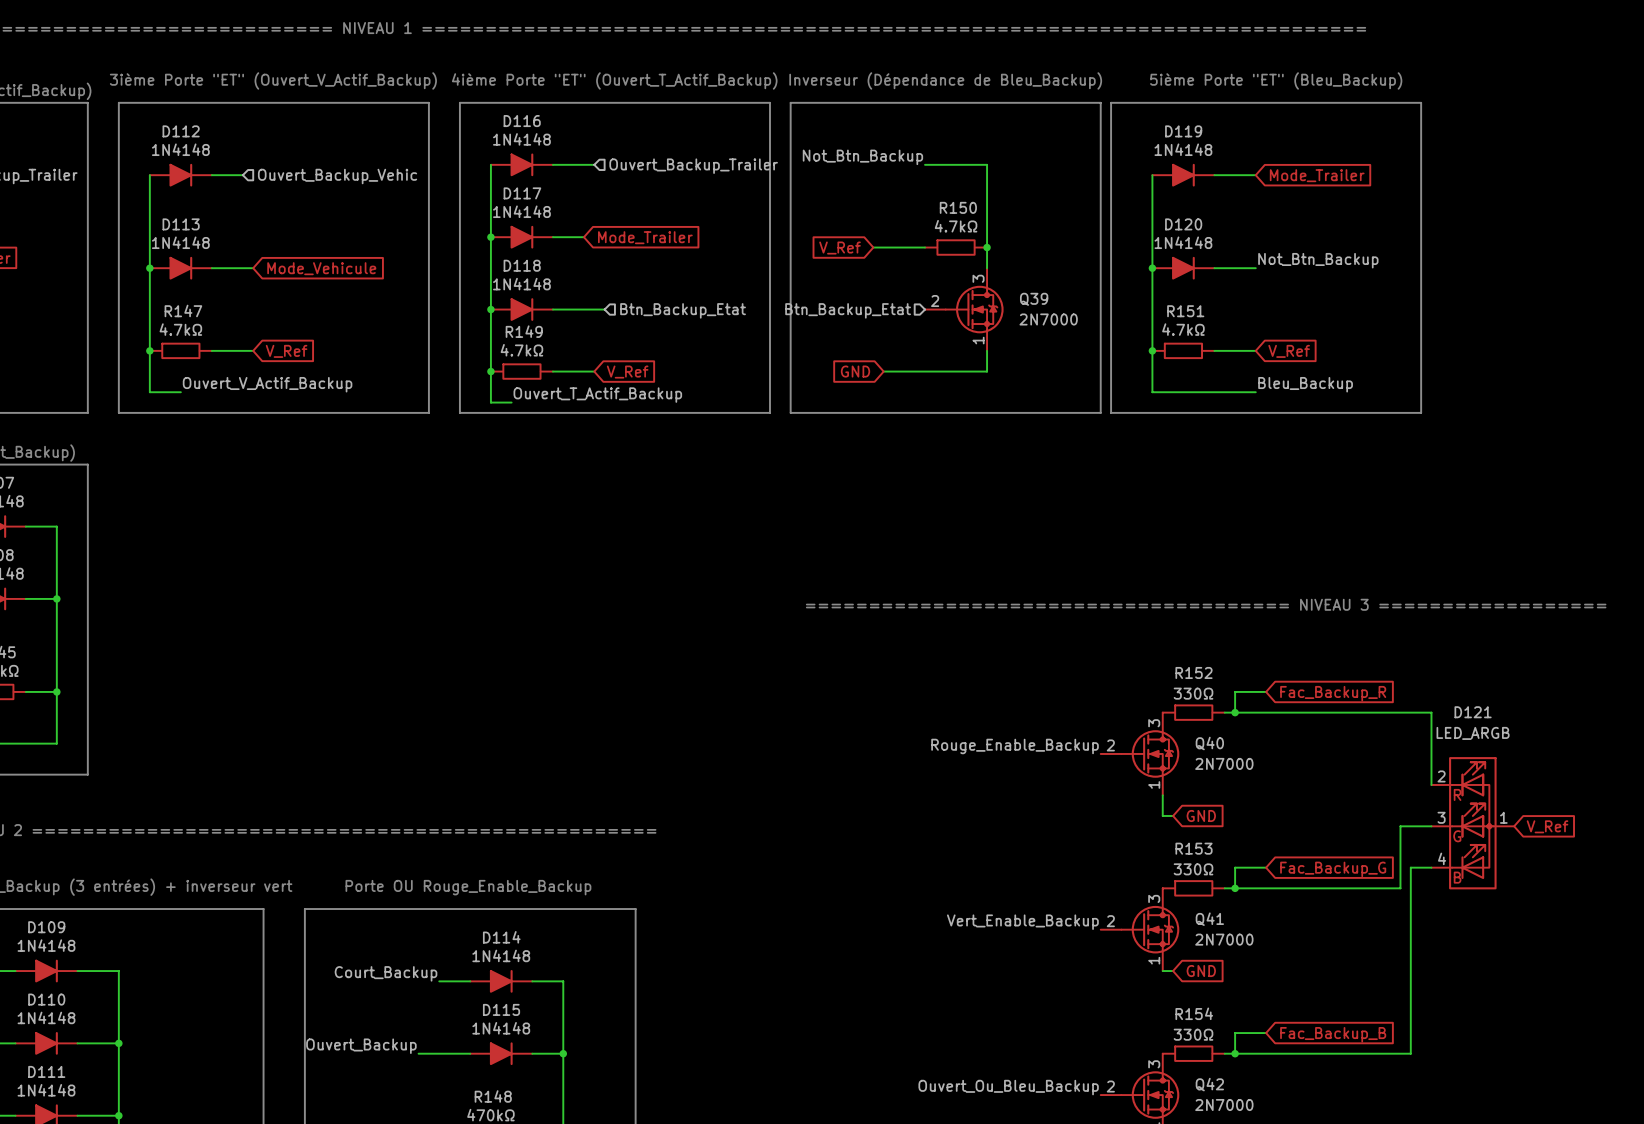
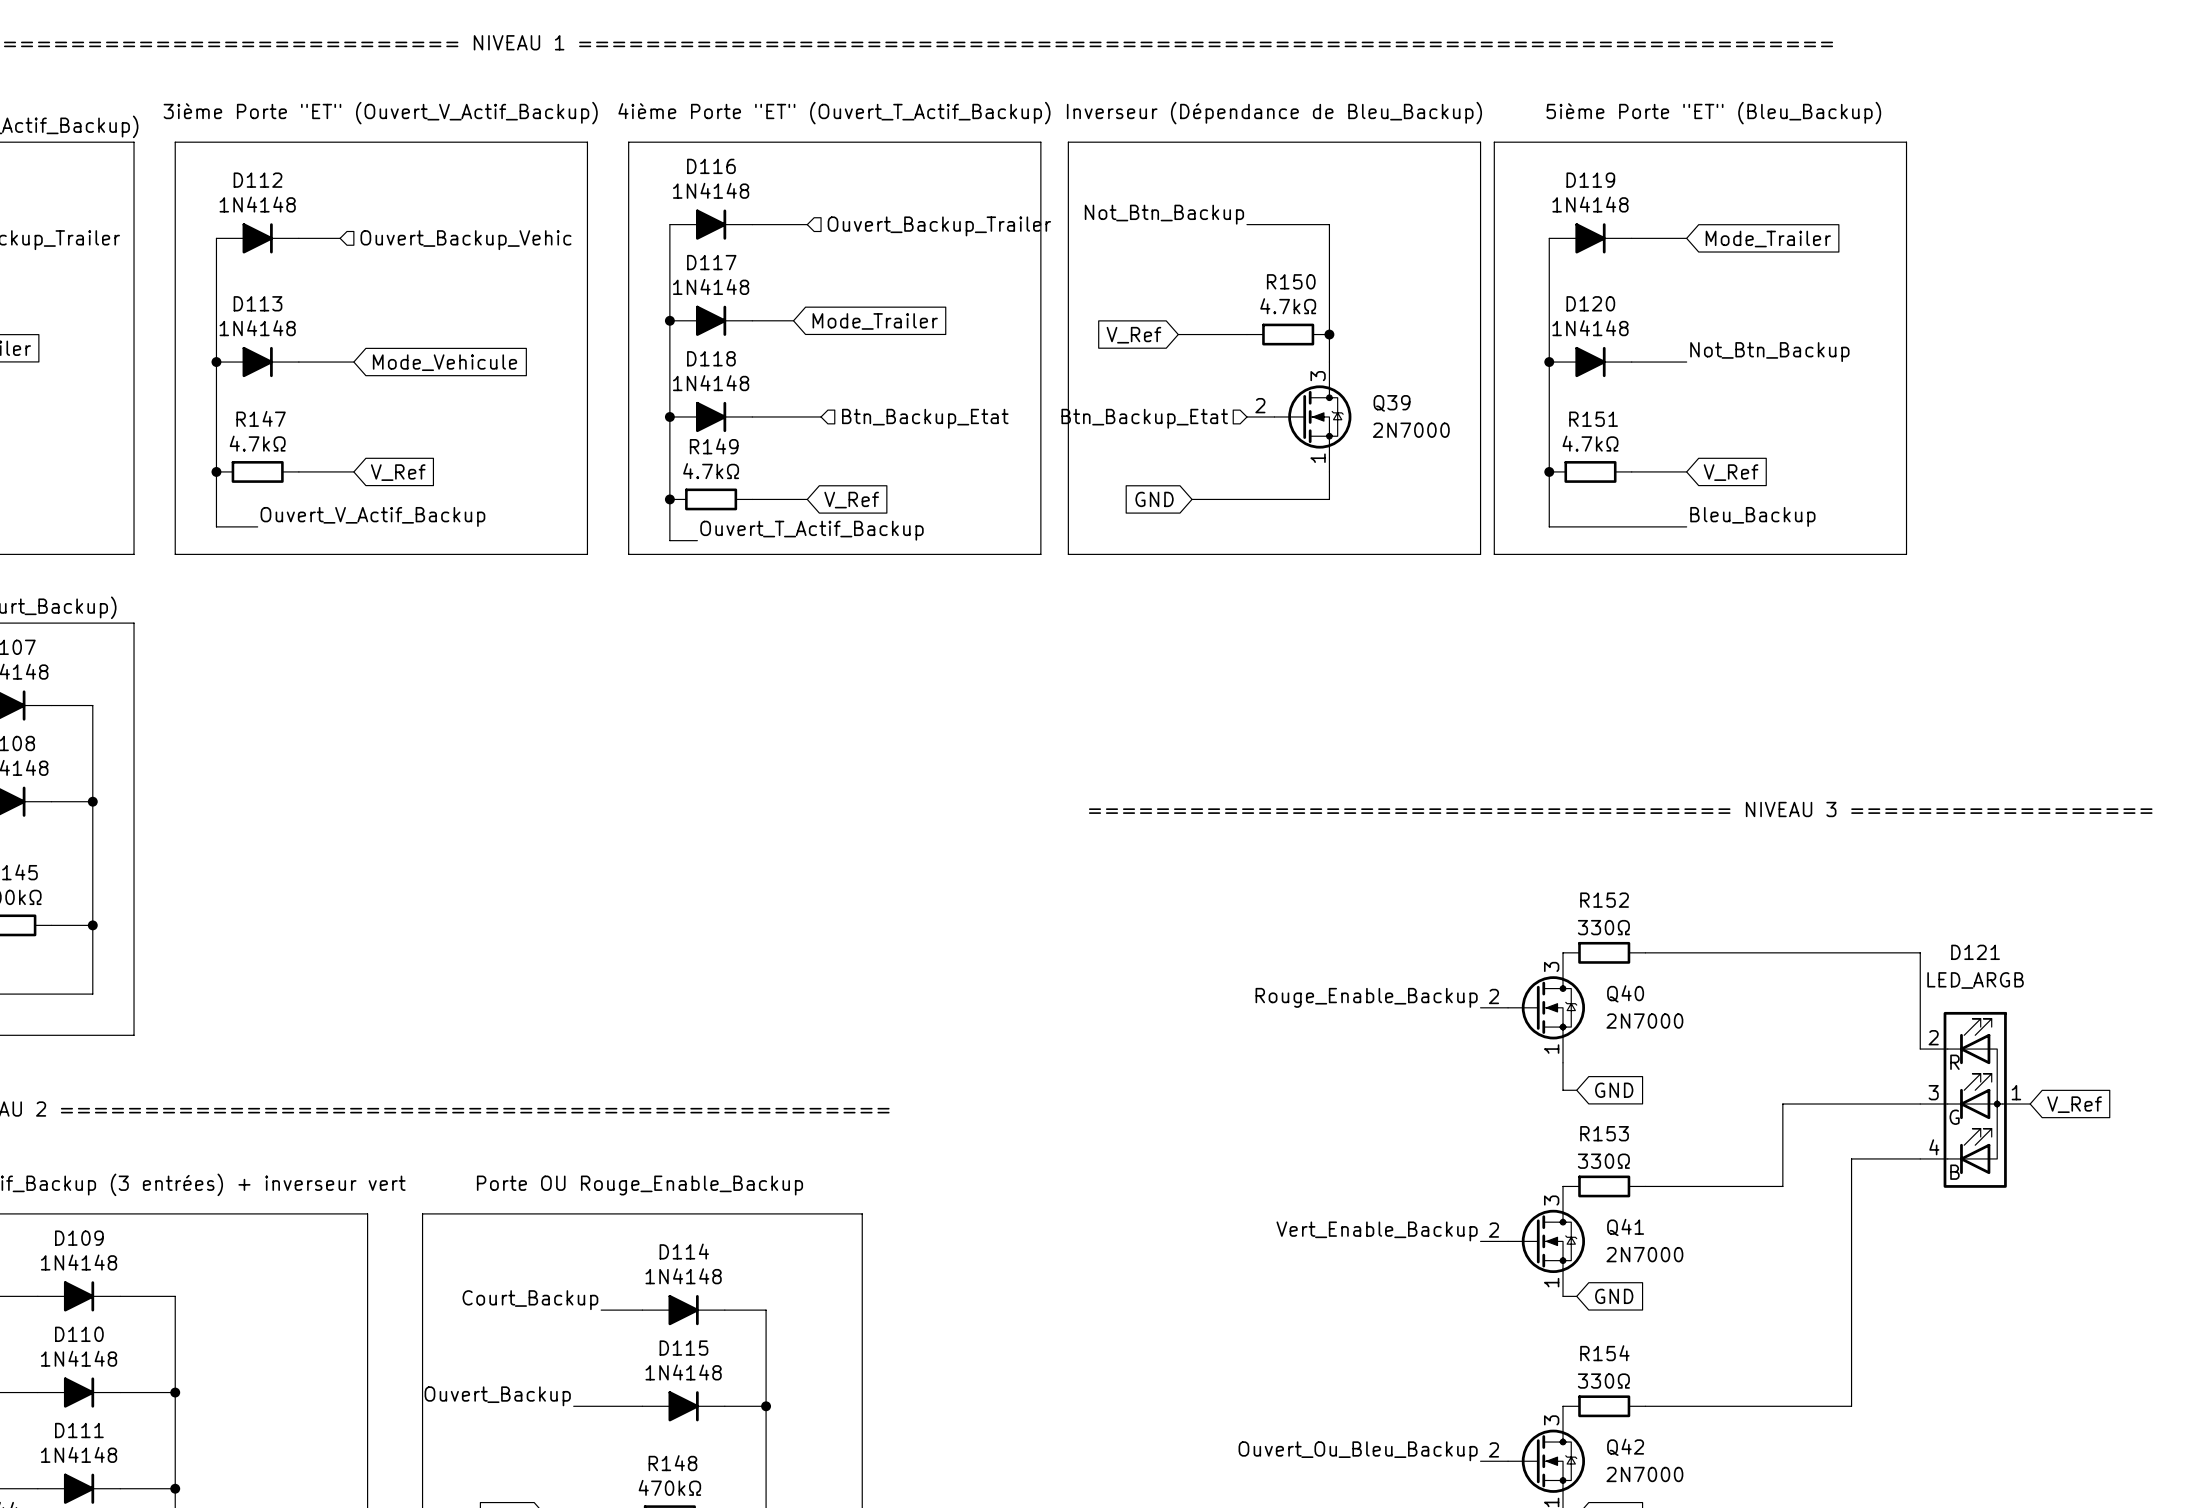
wire: (1266, 691) (1235, 691) (1235, 712) -> none
global label: Fac_Backup_R (1333, 693) -> none
junction: (1235, 712) -> none
wire: (1400, 826) (1400, 888) (1328, 888) -> (1879, 1104) (1782, 1104) (1782, 1186)
wire: (1266, 867) (1235, 867) (1235, 888) -> none
wire: (1410, 867) (1410, 1053) (1379, 1053) -> (1892, 1158) (1851, 1158) (1851, 1406)
global label: Fac_Backup_G (1333, 869) -> none
junction: (1235, 888) -> none
wire: (1266, 1033) (1235, 1033) (1235, 1053) -> none
global label: Fac_Backup_B (1333, 1034) -> none
junction: (1235, 1053) -> none

